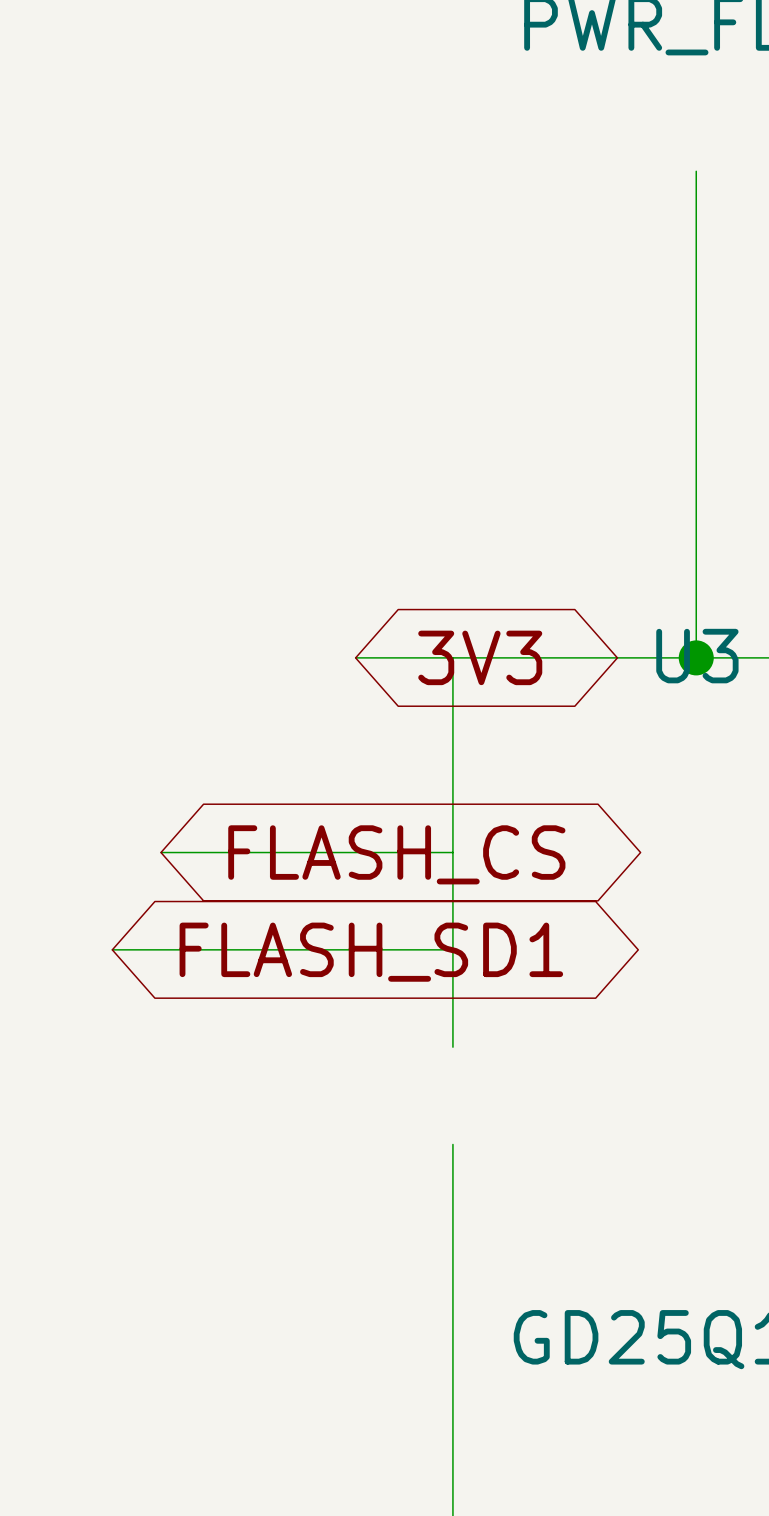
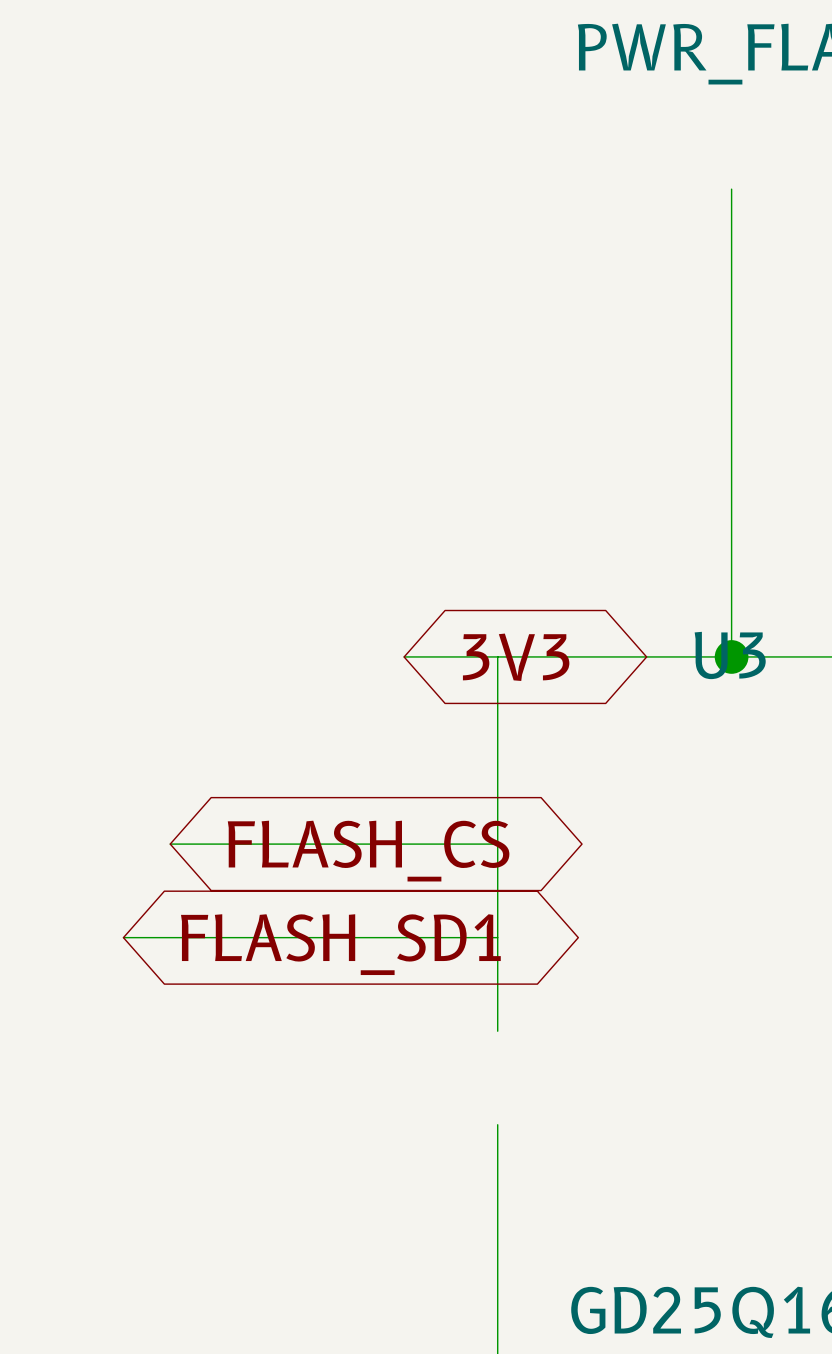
wire: none -> (170, 844) (217, 844)
global label position: FLASH_CS (396, 854) -> FLASH_CS (368, 851)
wire: none -> (123, 937) (170, 937)
global label position: FLASH_SD1 (371, 952) -> FLASH_SD1 (340, 944)

